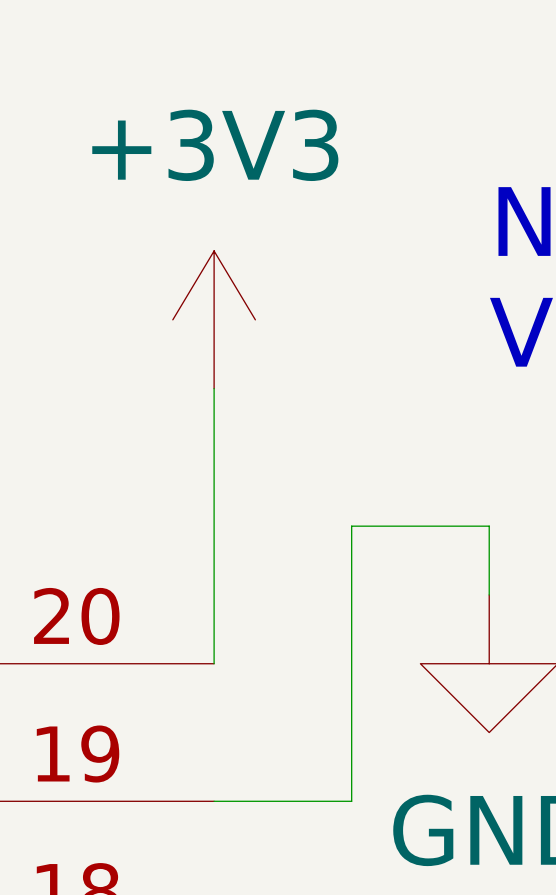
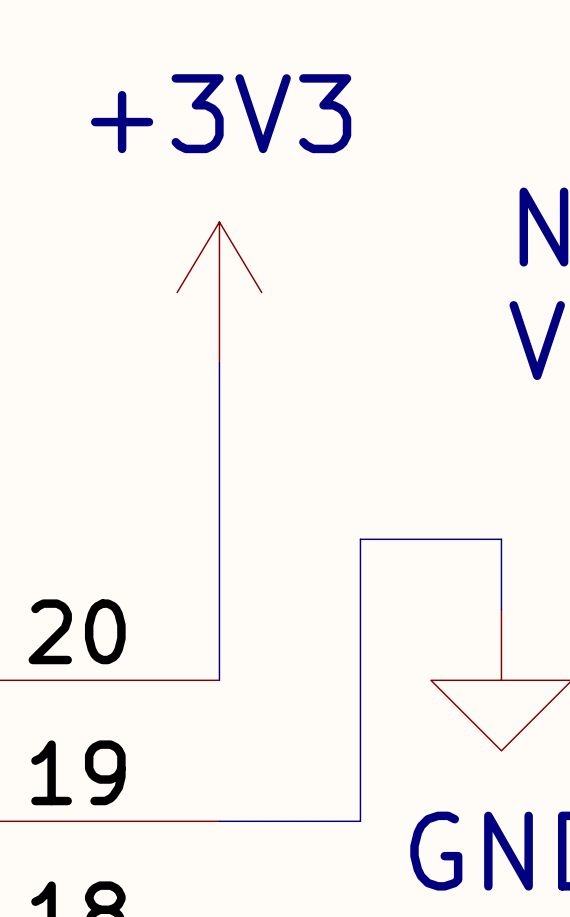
power symbol position: +3V3 (214, 319) -> +3V3 (219, 292)

